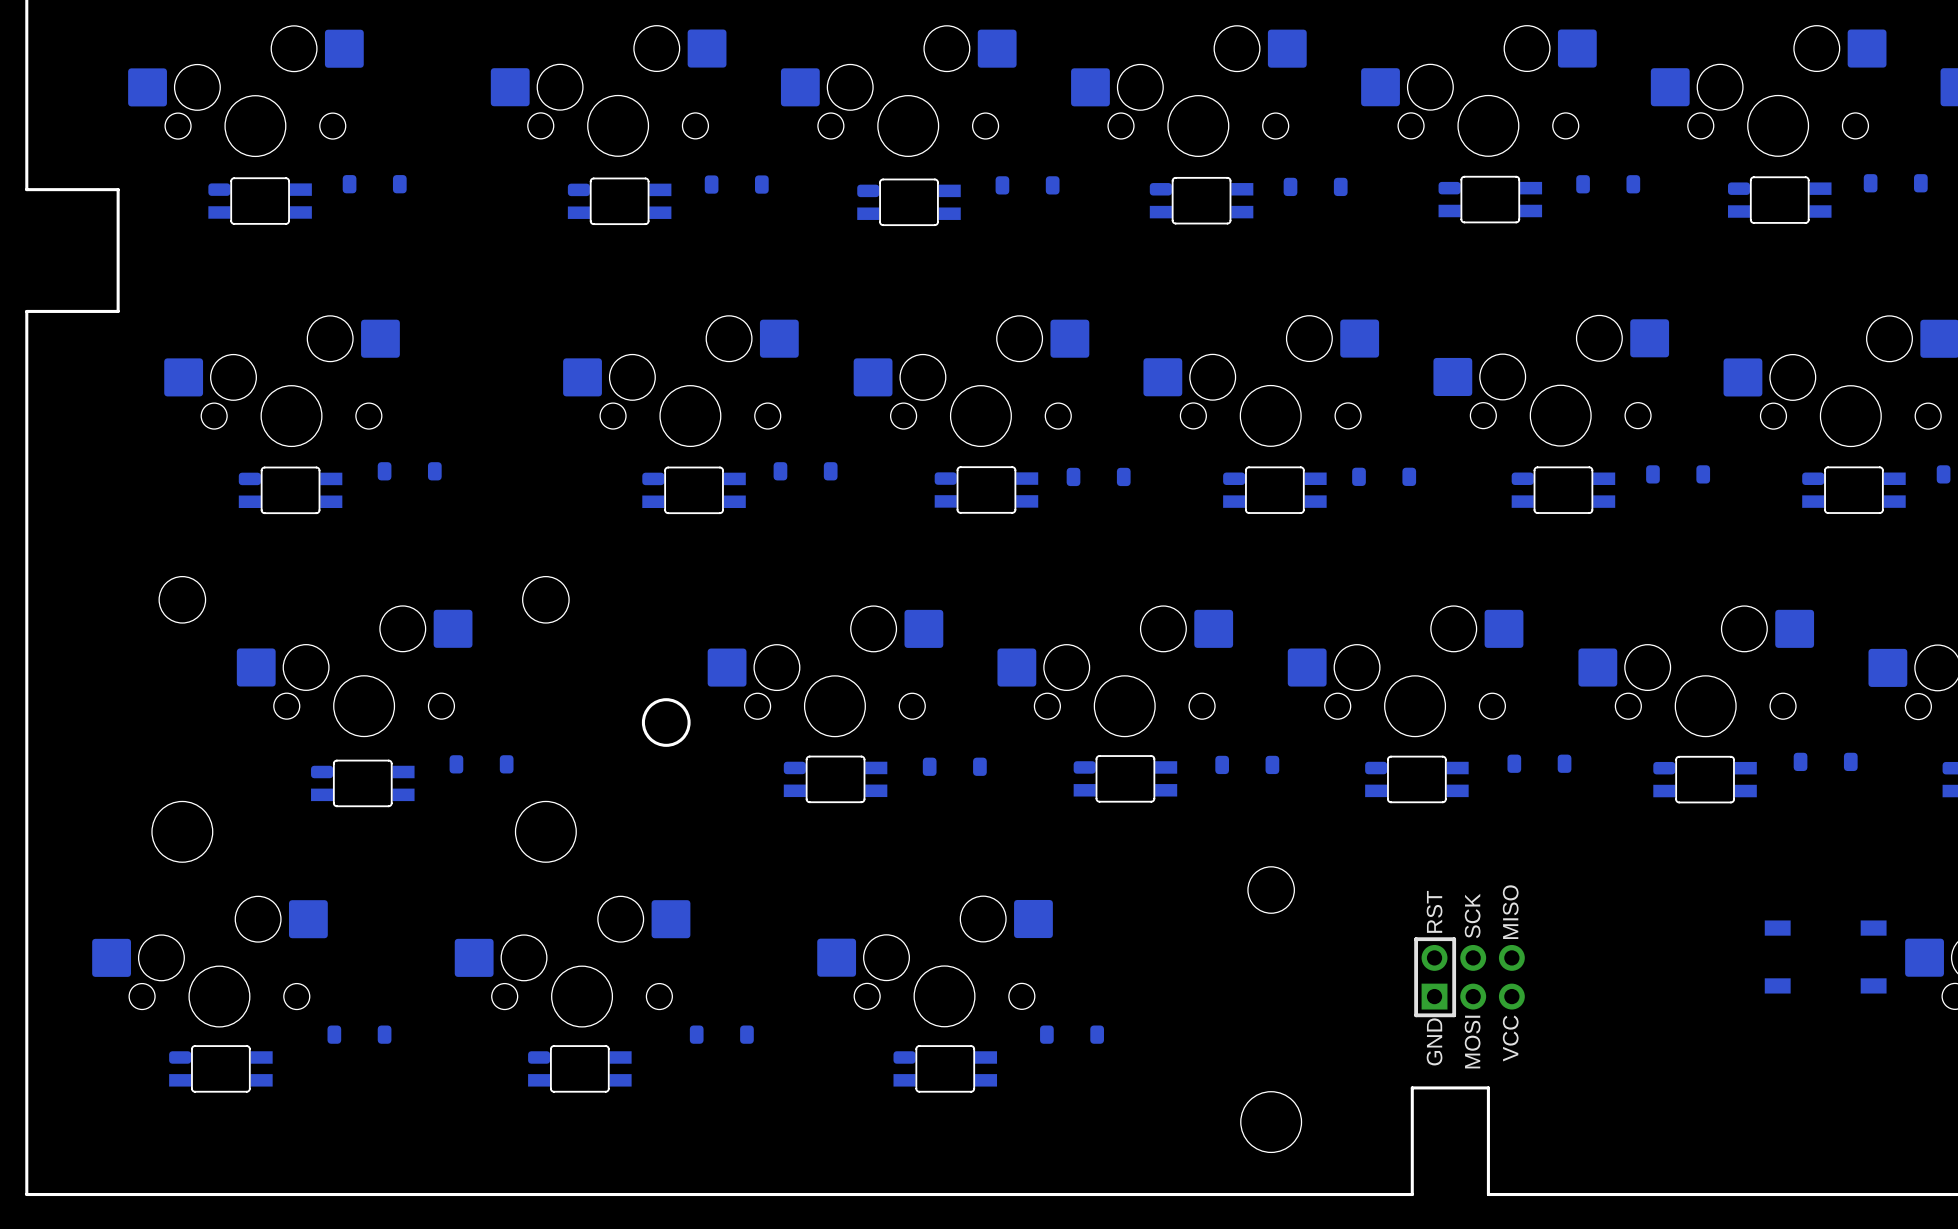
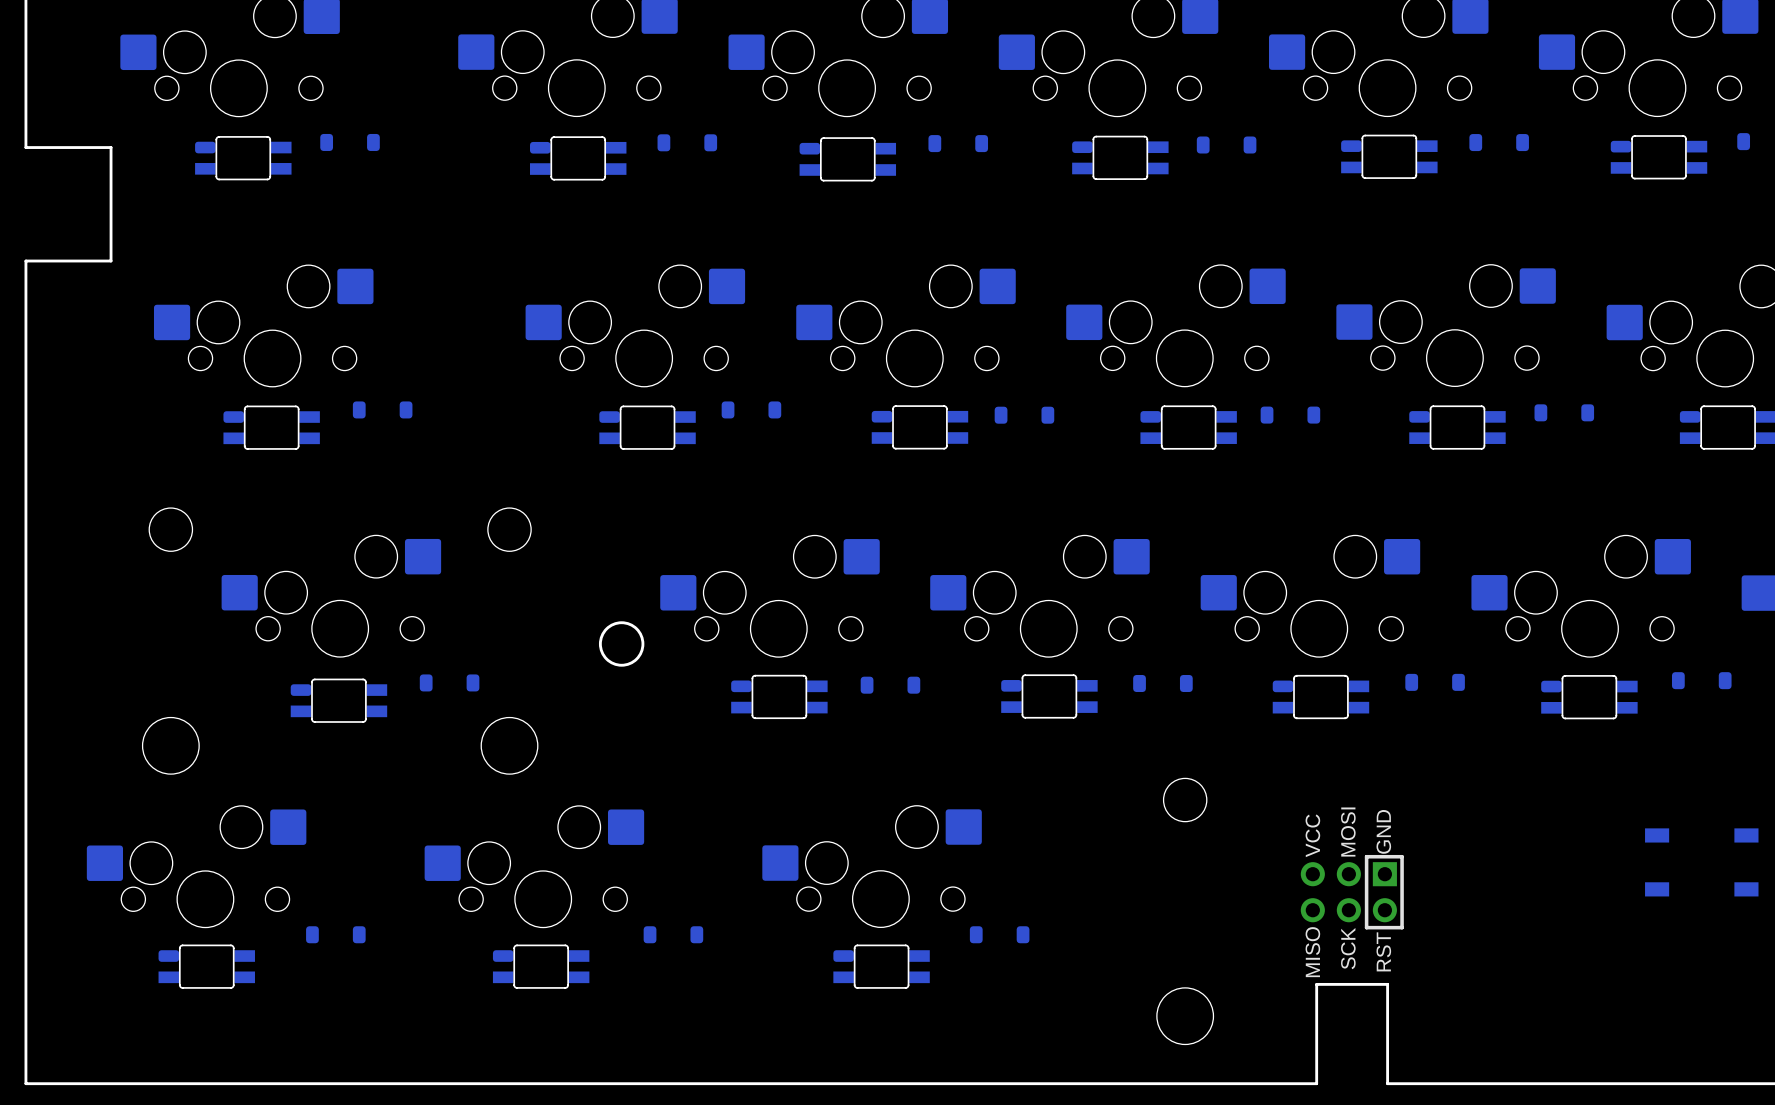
part rotation: 0° (1469, 977) -> 180° (1352, 892)

